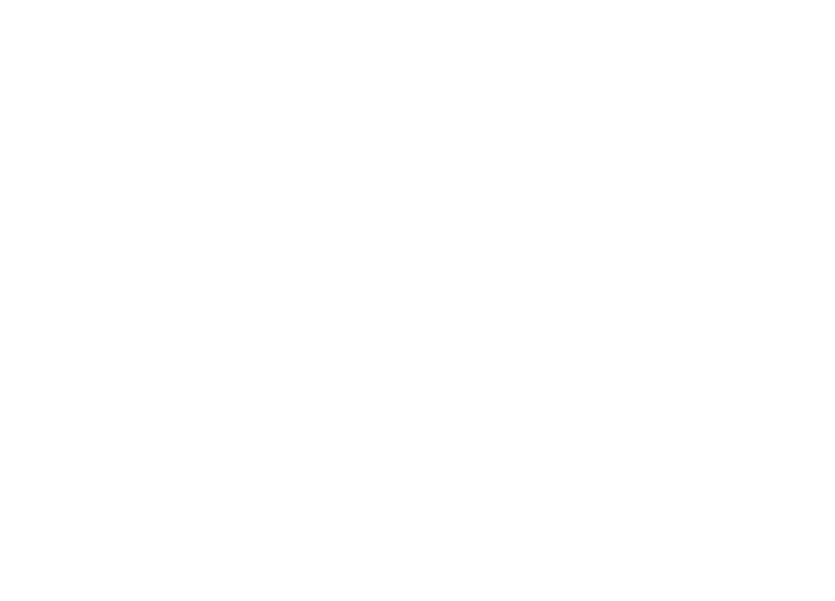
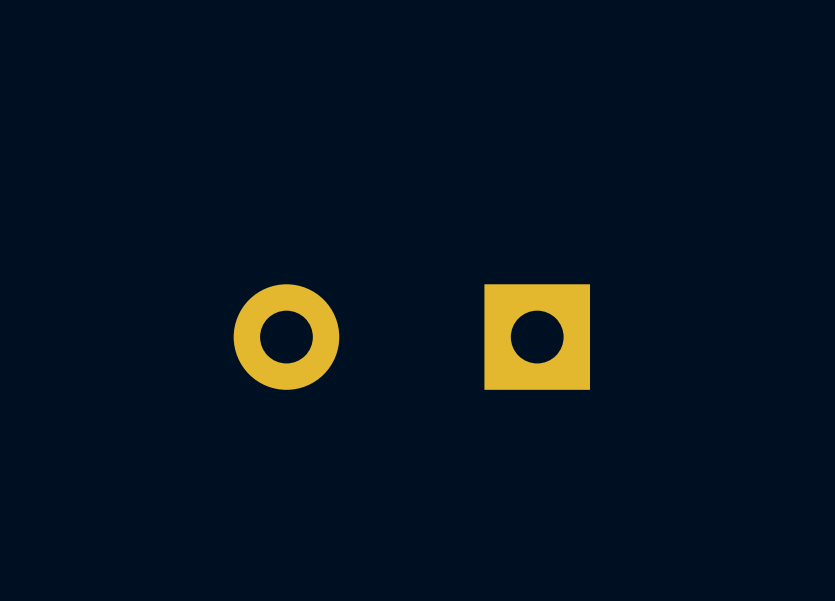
part: none -> (411, 337)

